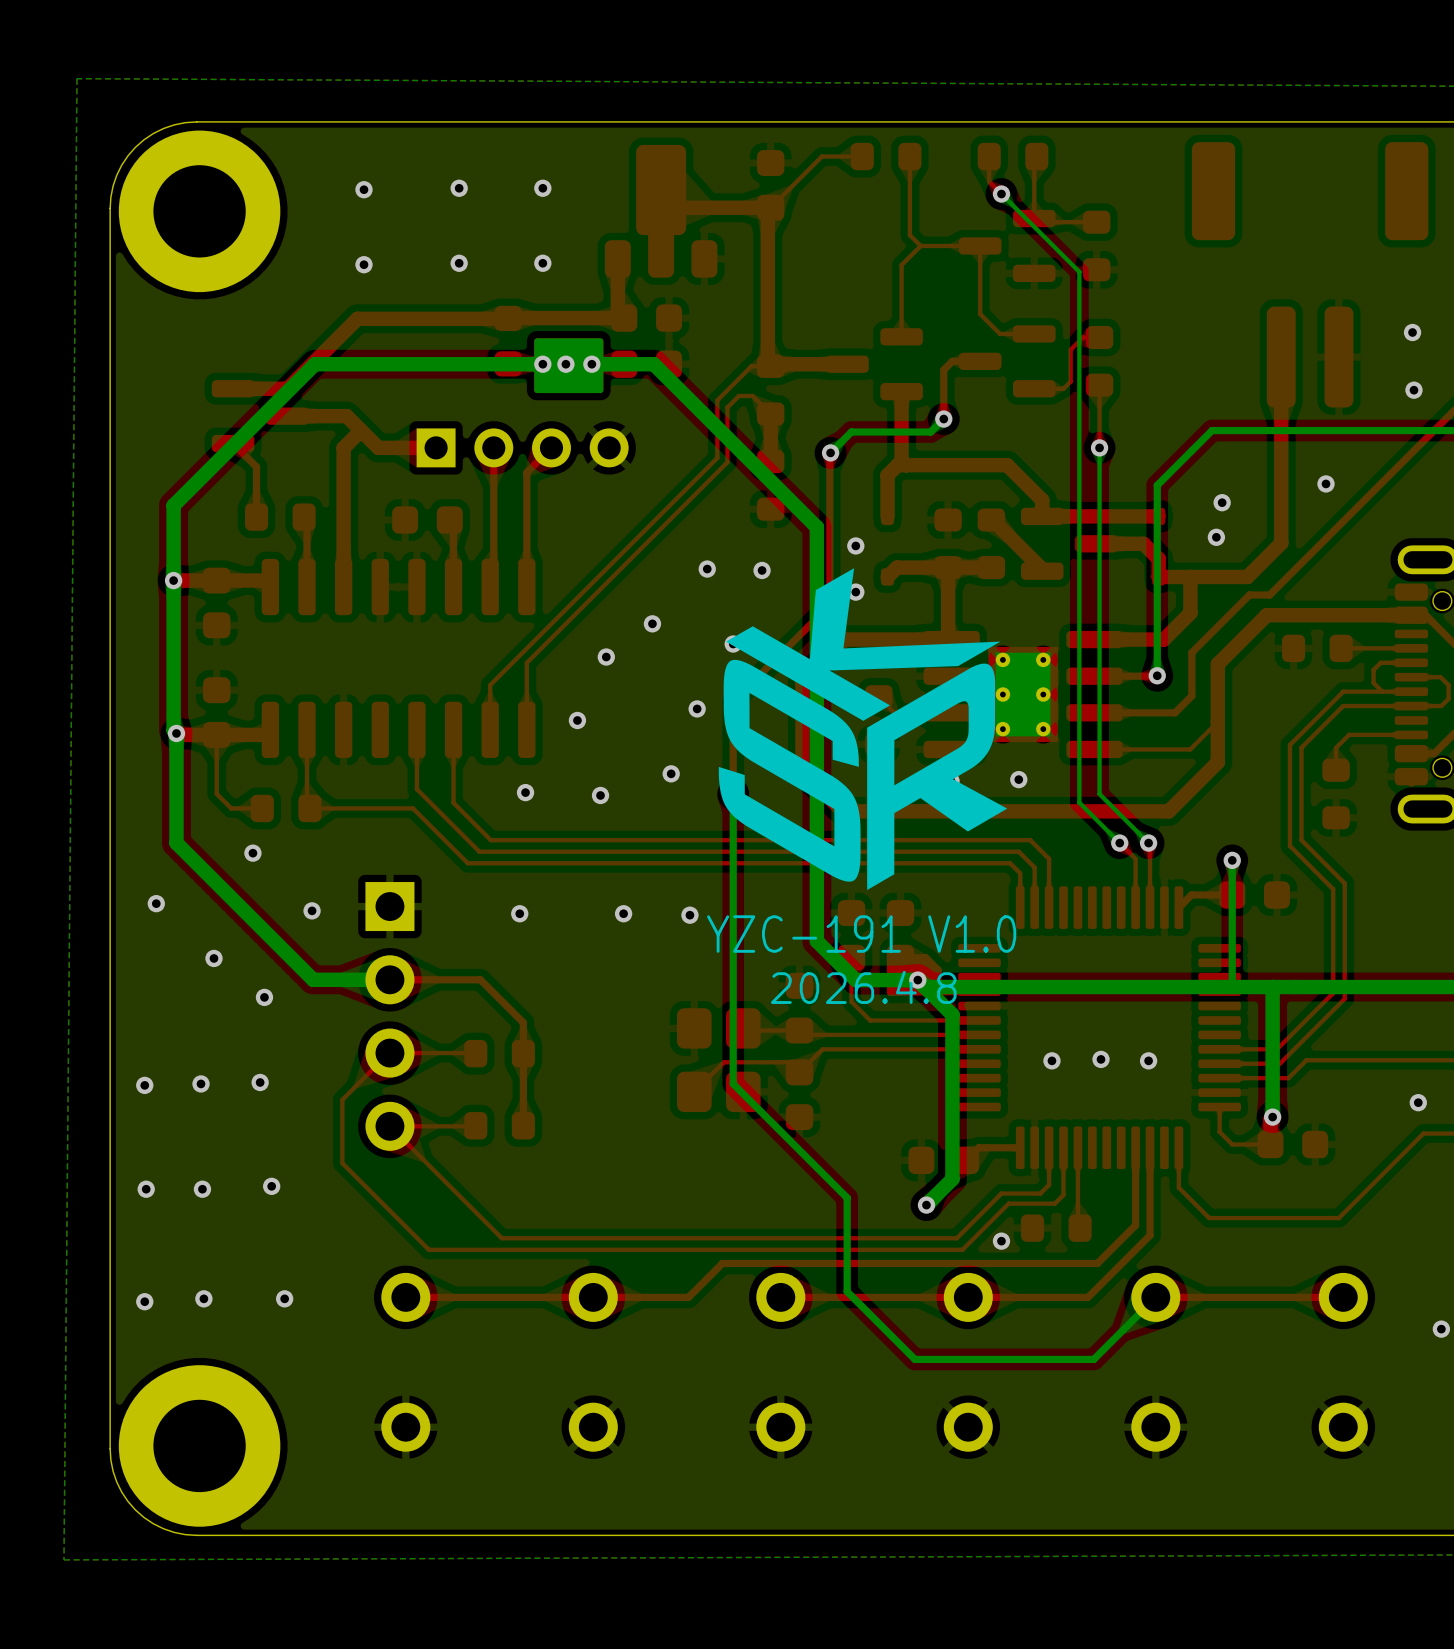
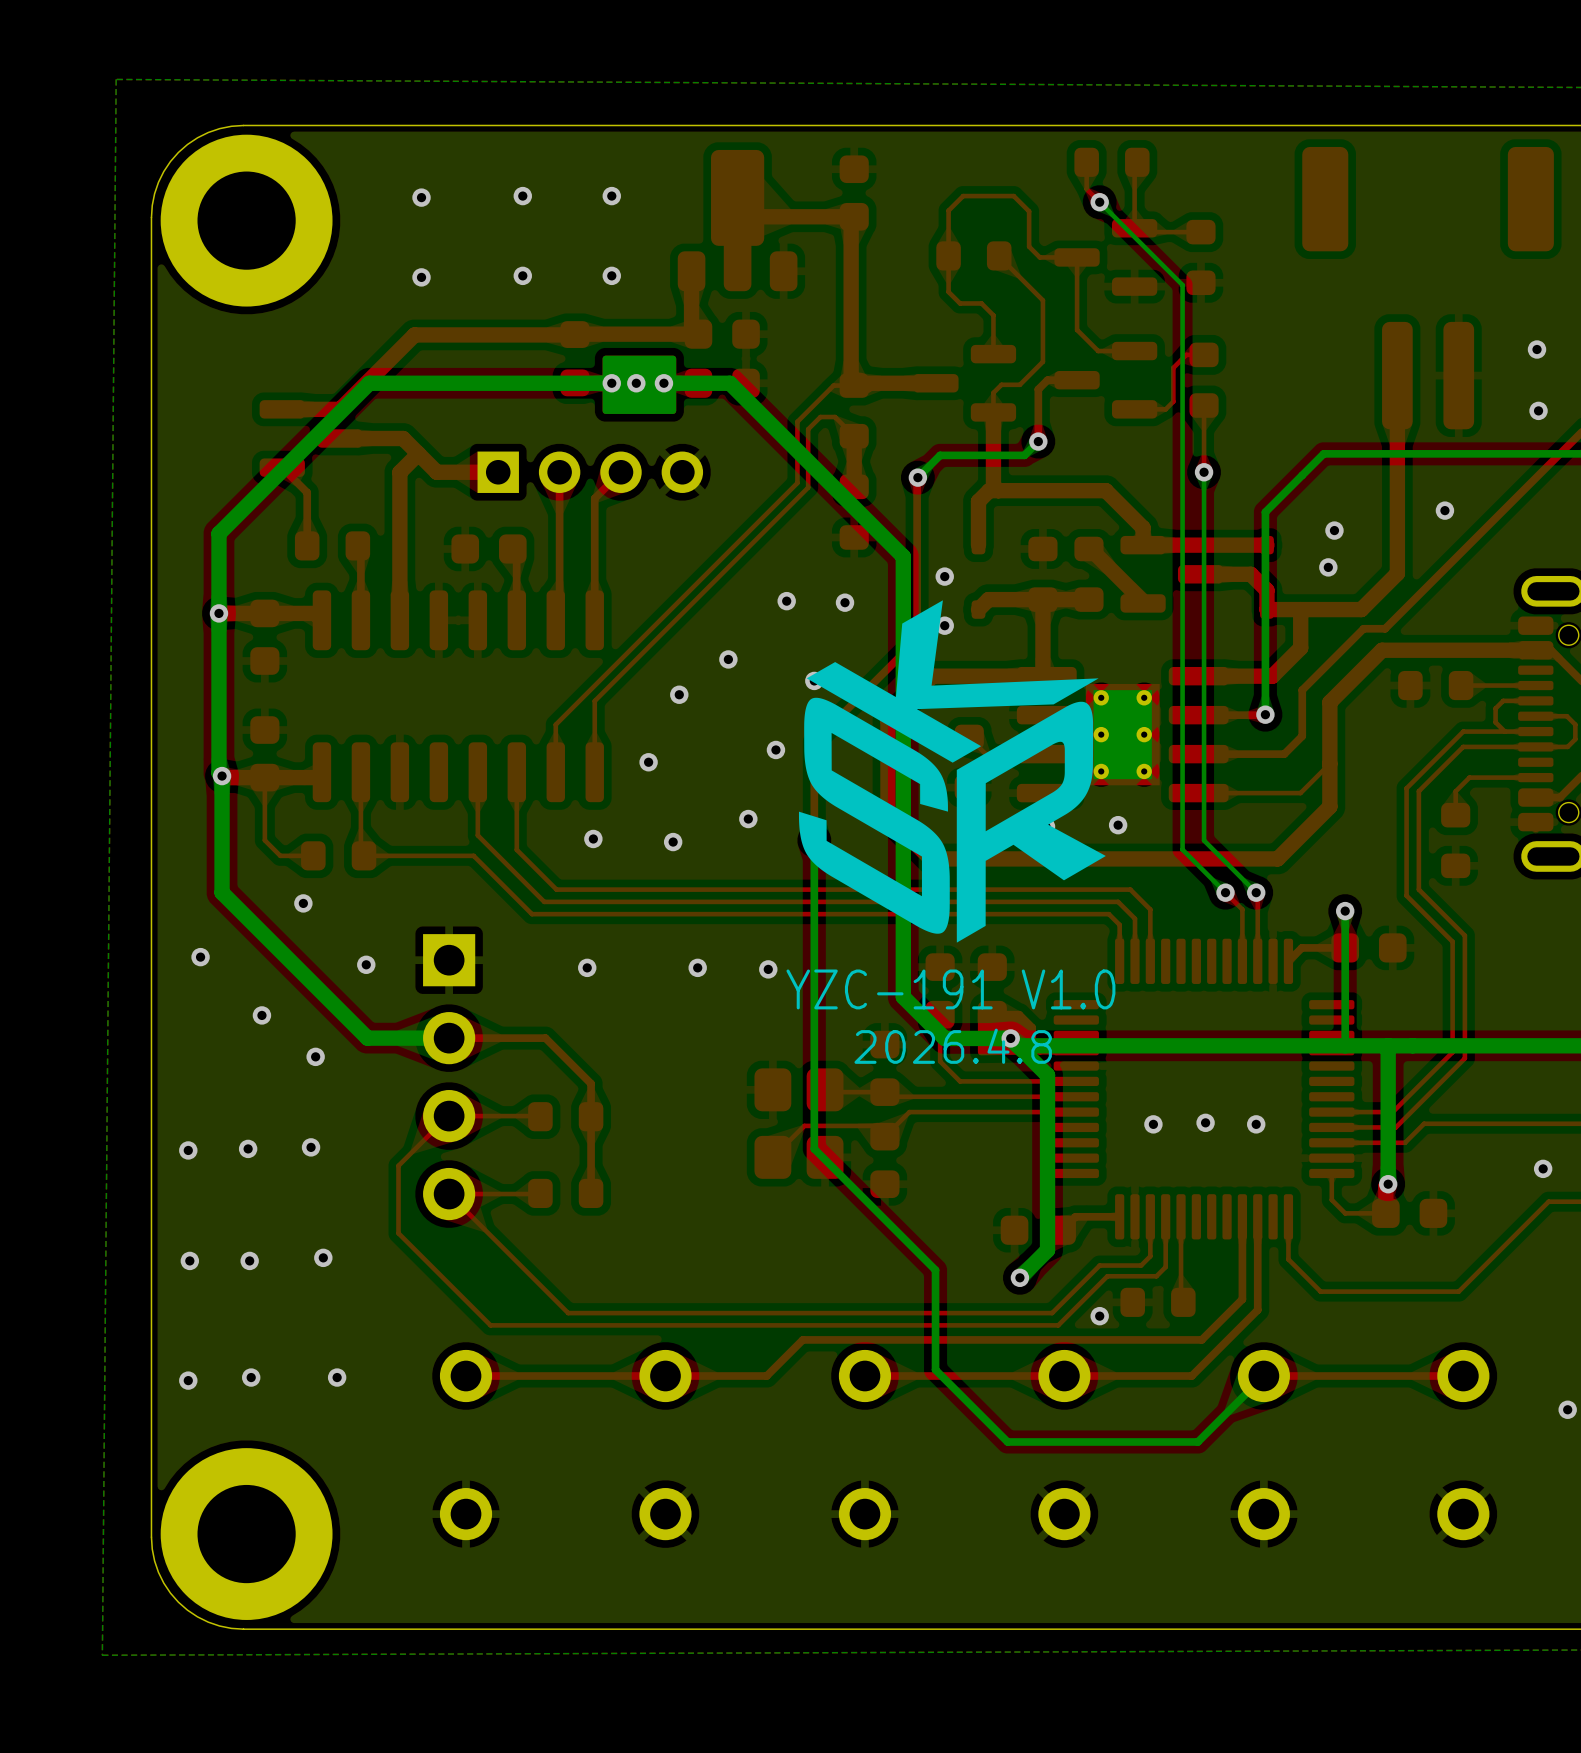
top track: (862, 156) (821, 156) (770, 207) -> none
part position: (886, 156) -> (973, 255)
top track: (909, 156) (909, 235) (920, 245) -> none
top track: none -> (999, 255) (1042, 300) (1042, 361) (1019, 384) (1001, 384) (993, 392) (993, 412)
top track: (920, 245) (901, 265) (901, 300) -> (1039, 257) (1029, 246) (1029, 211) (1013, 196) (963, 196) (948, 210) (948, 291) (960, 303) (981, 303) (993, 315)
top track: (945, 245) (920, 245) -> none

